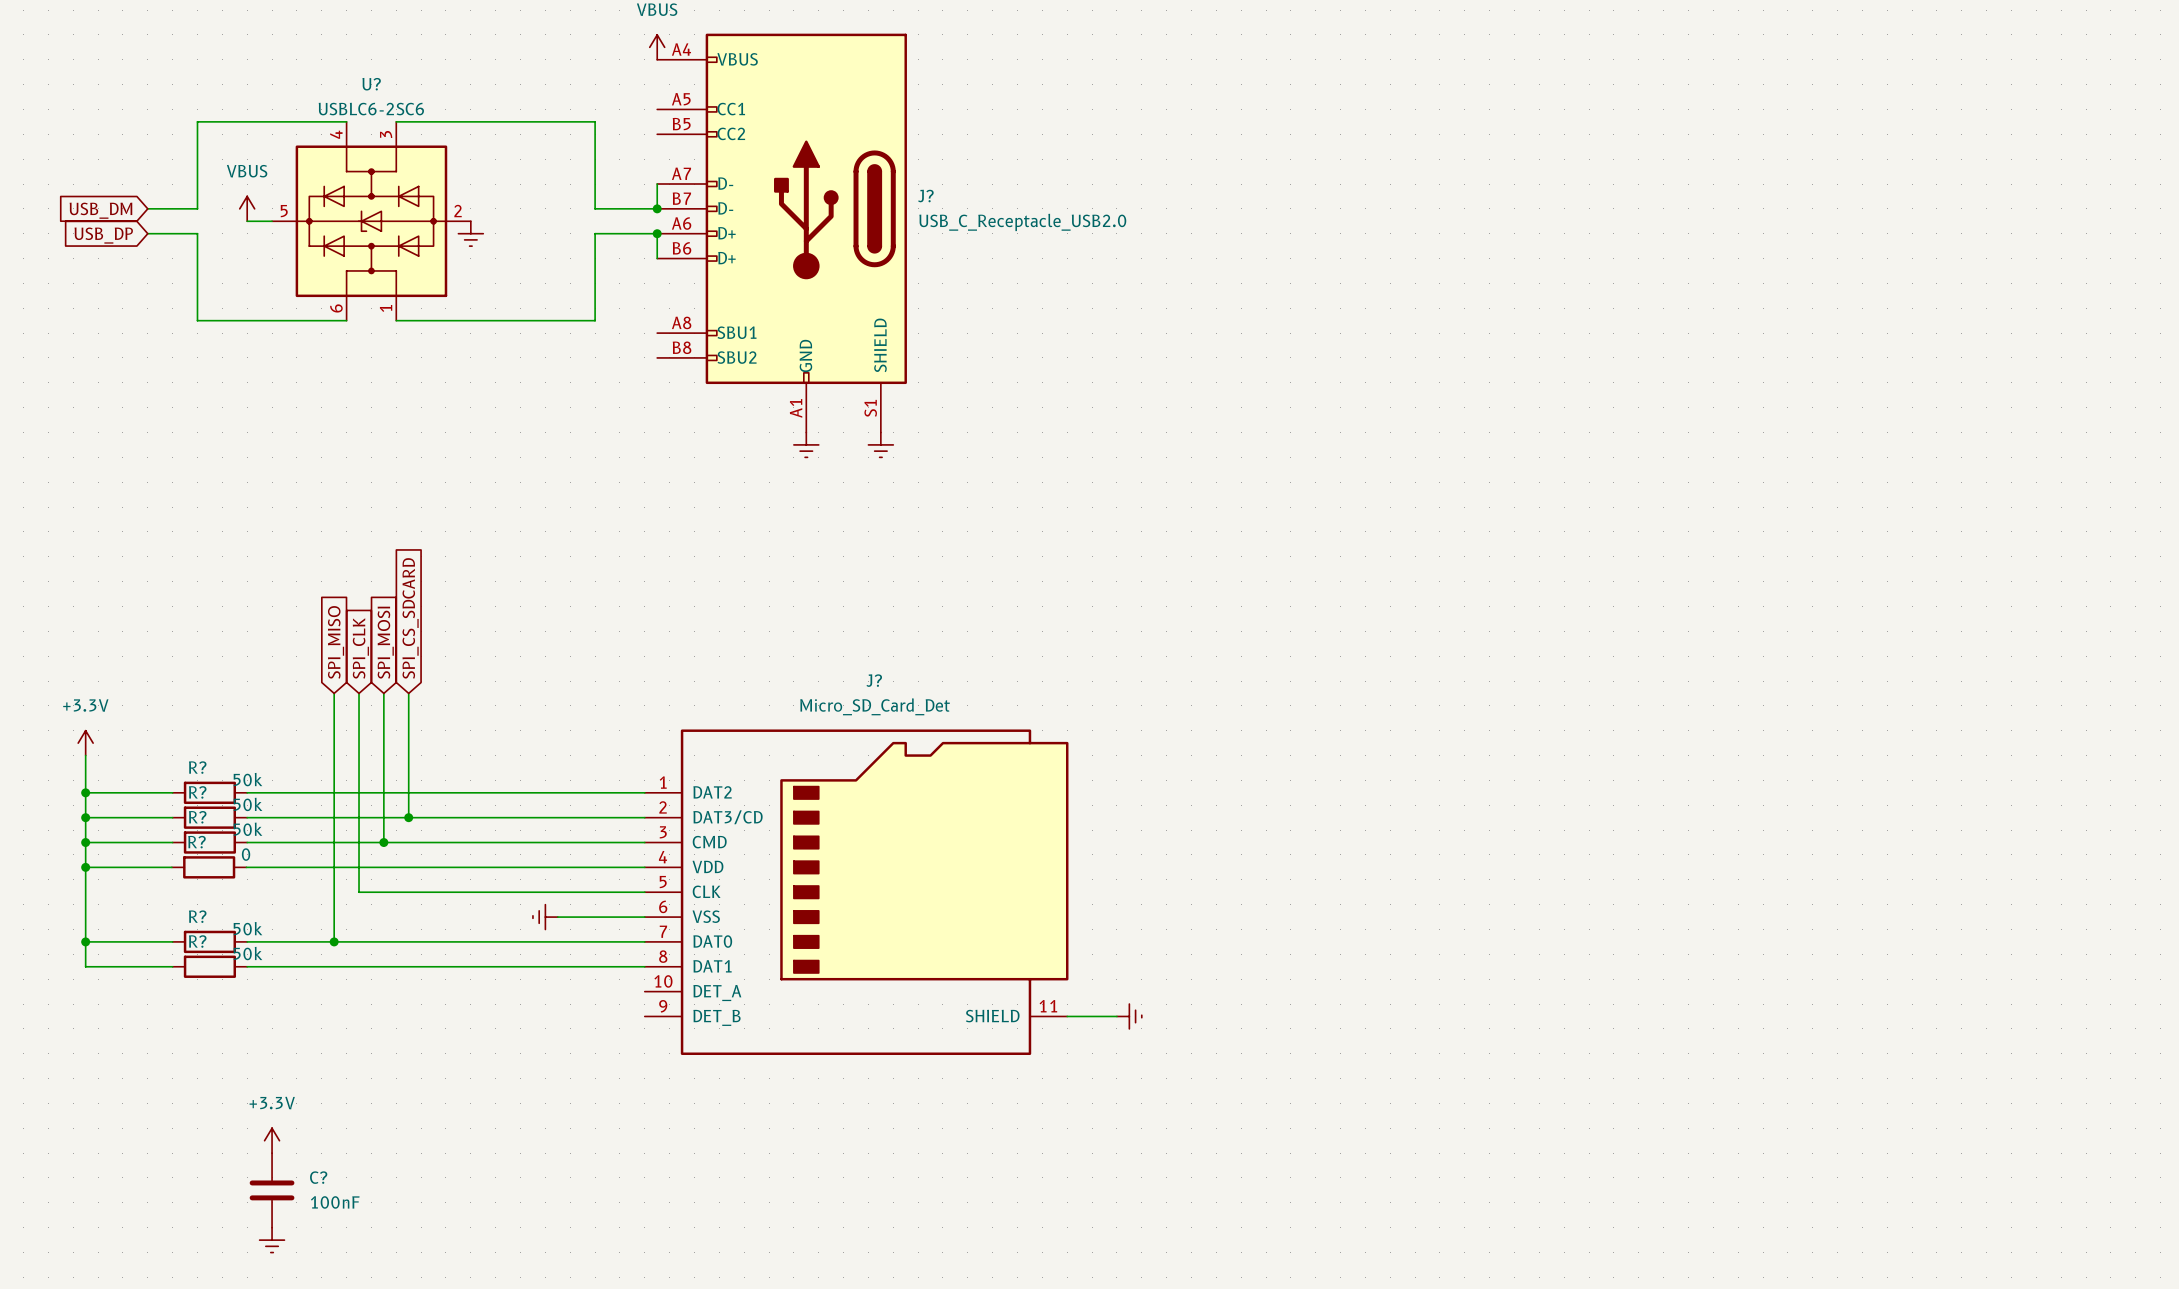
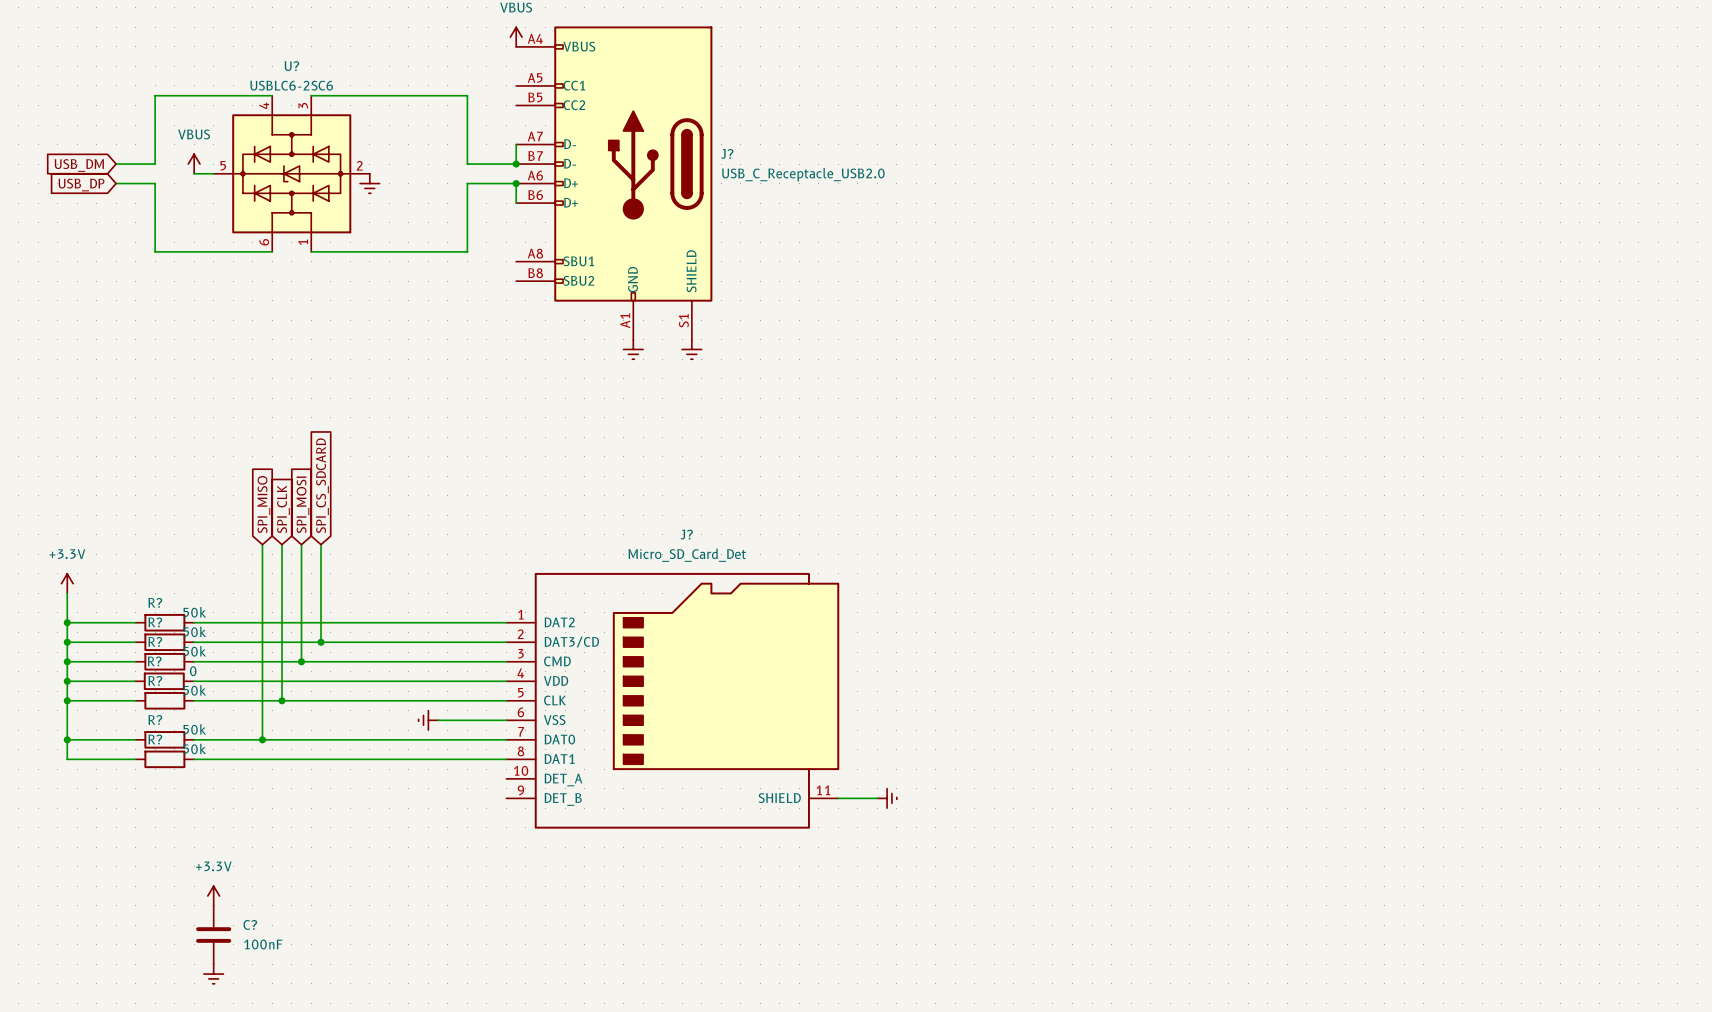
wire: none -> (67, 700) (135, 700)
junction: none -> (67, 700)
R?: none -> 50k (164, 700)
wire: none -> (194, 700) (281, 700)
junction: none -> (281, 700)

